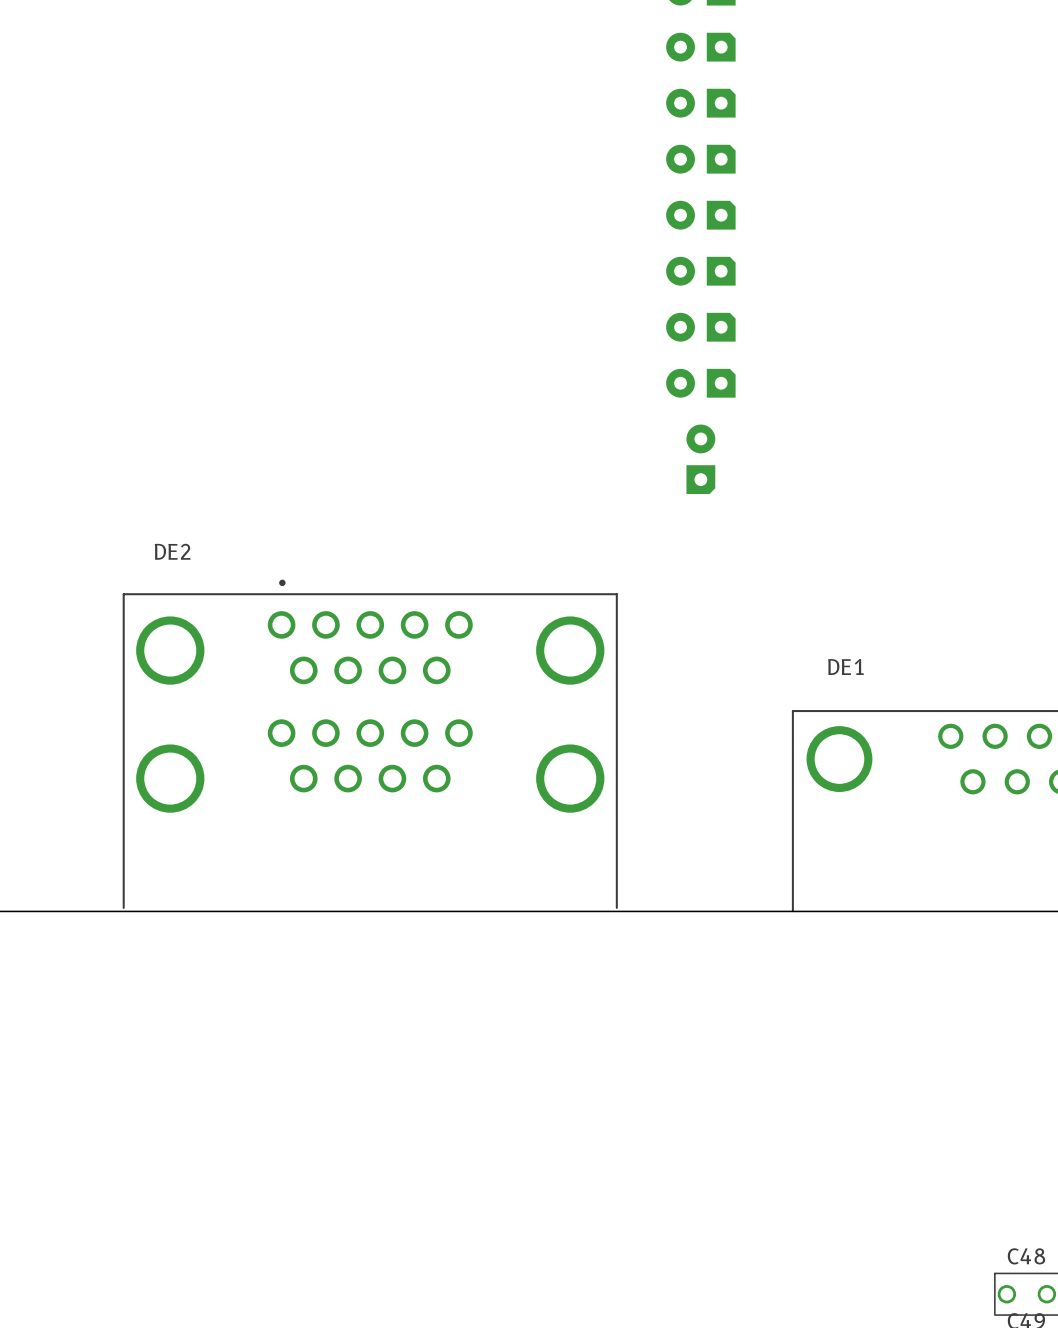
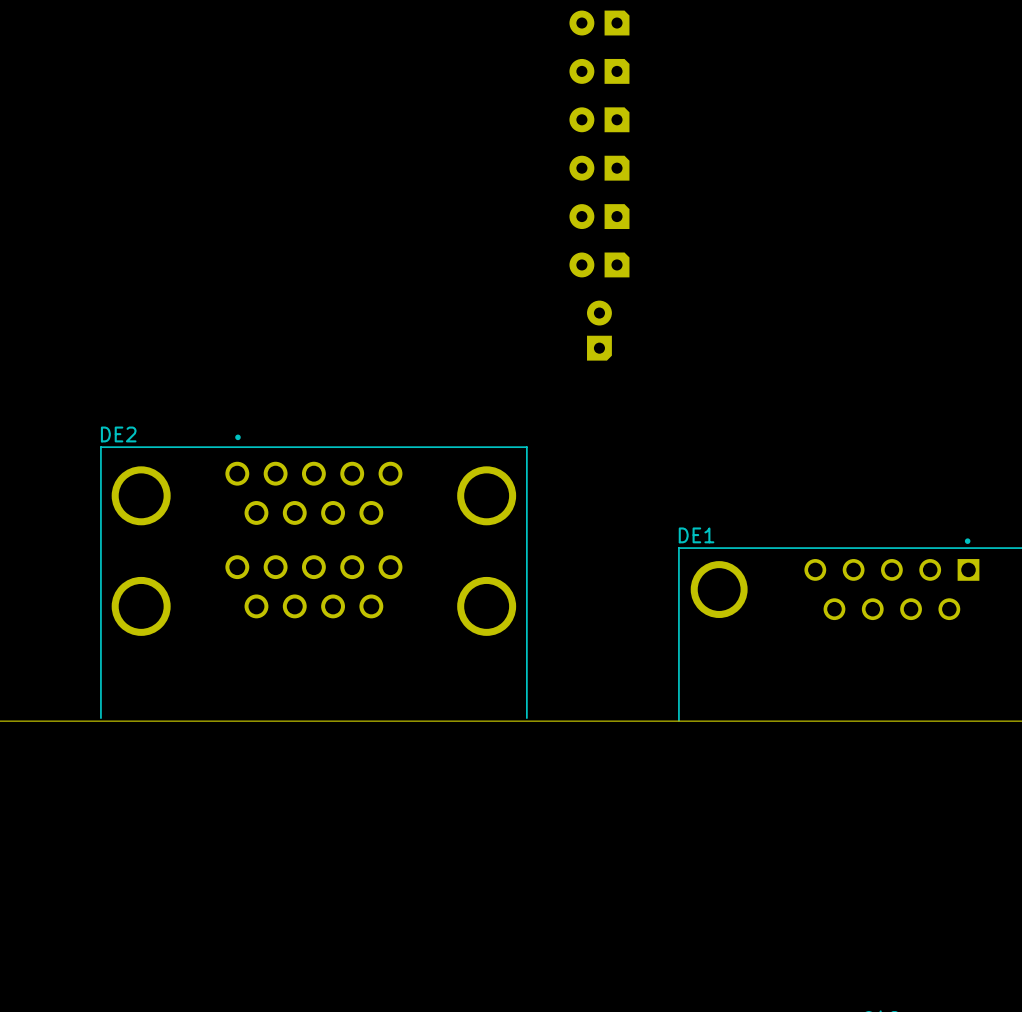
DE2 name position: DE2 (172, 551) -> DE2 (118, 434)
DE1 name position: DE1 (845, 666) -> DE1 (696, 535)

